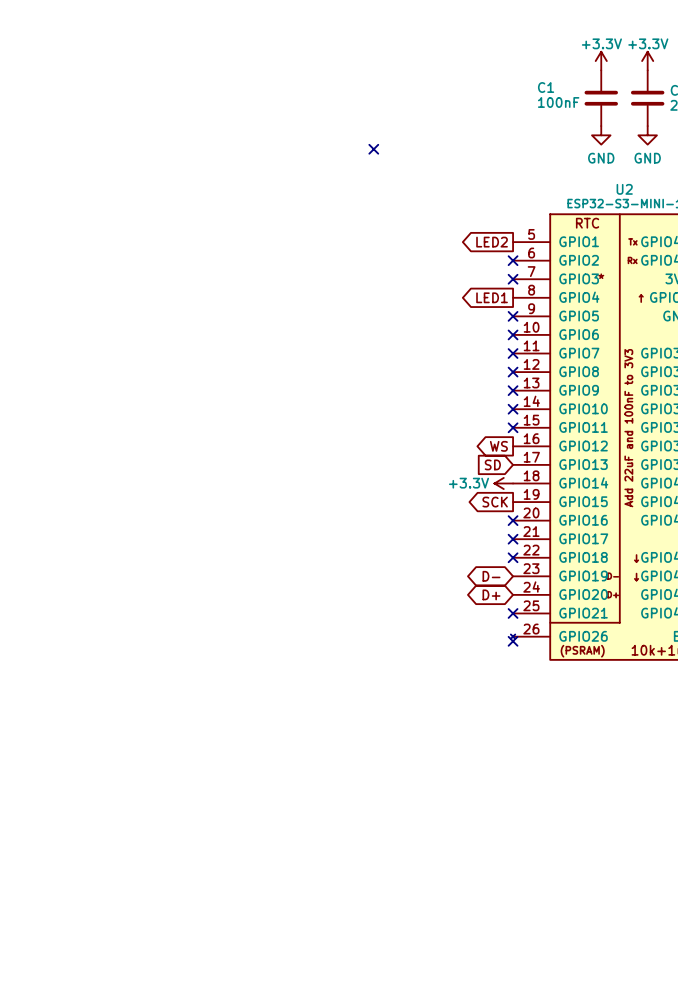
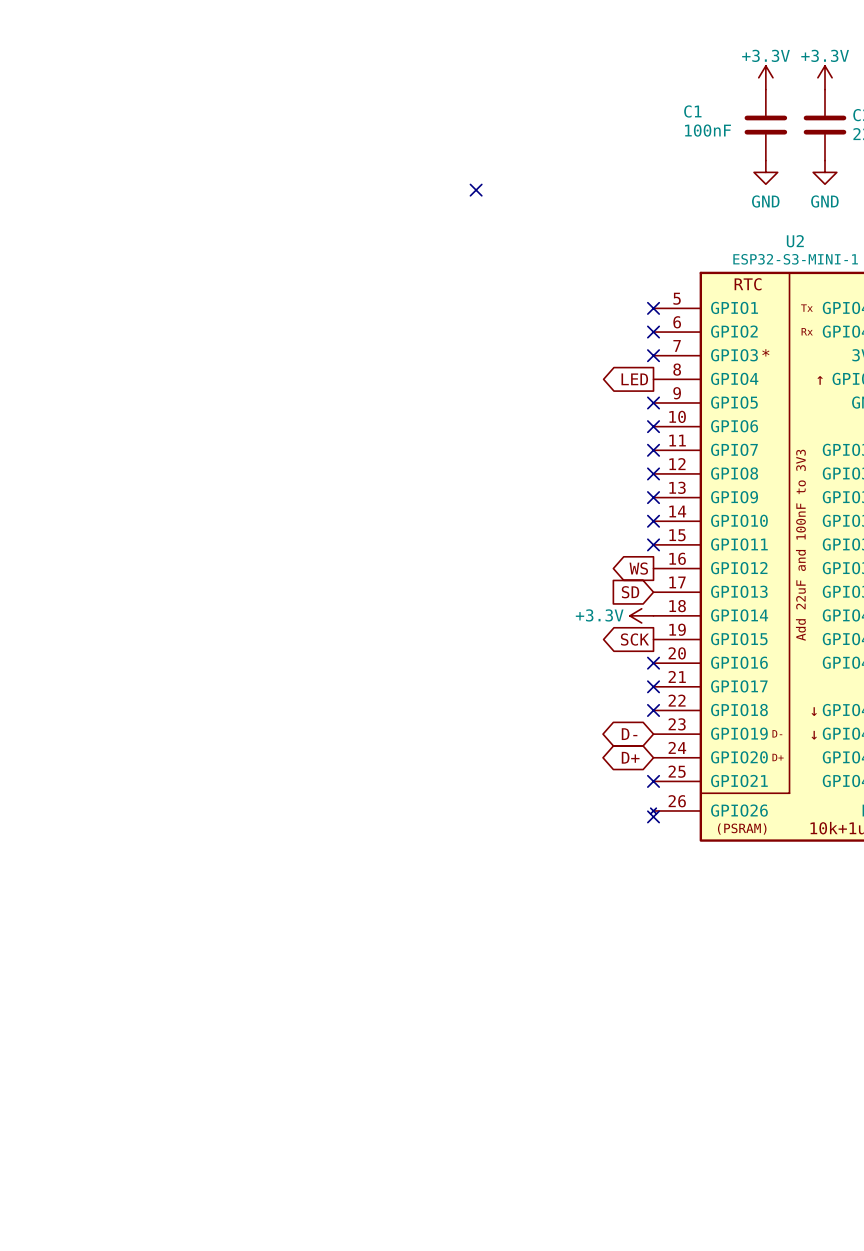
global label: LED2 (492, 242) -> none
no-connect mark: none -> (653, 308)
global label: LED1 (492, 297) -> LED (634, 379)

